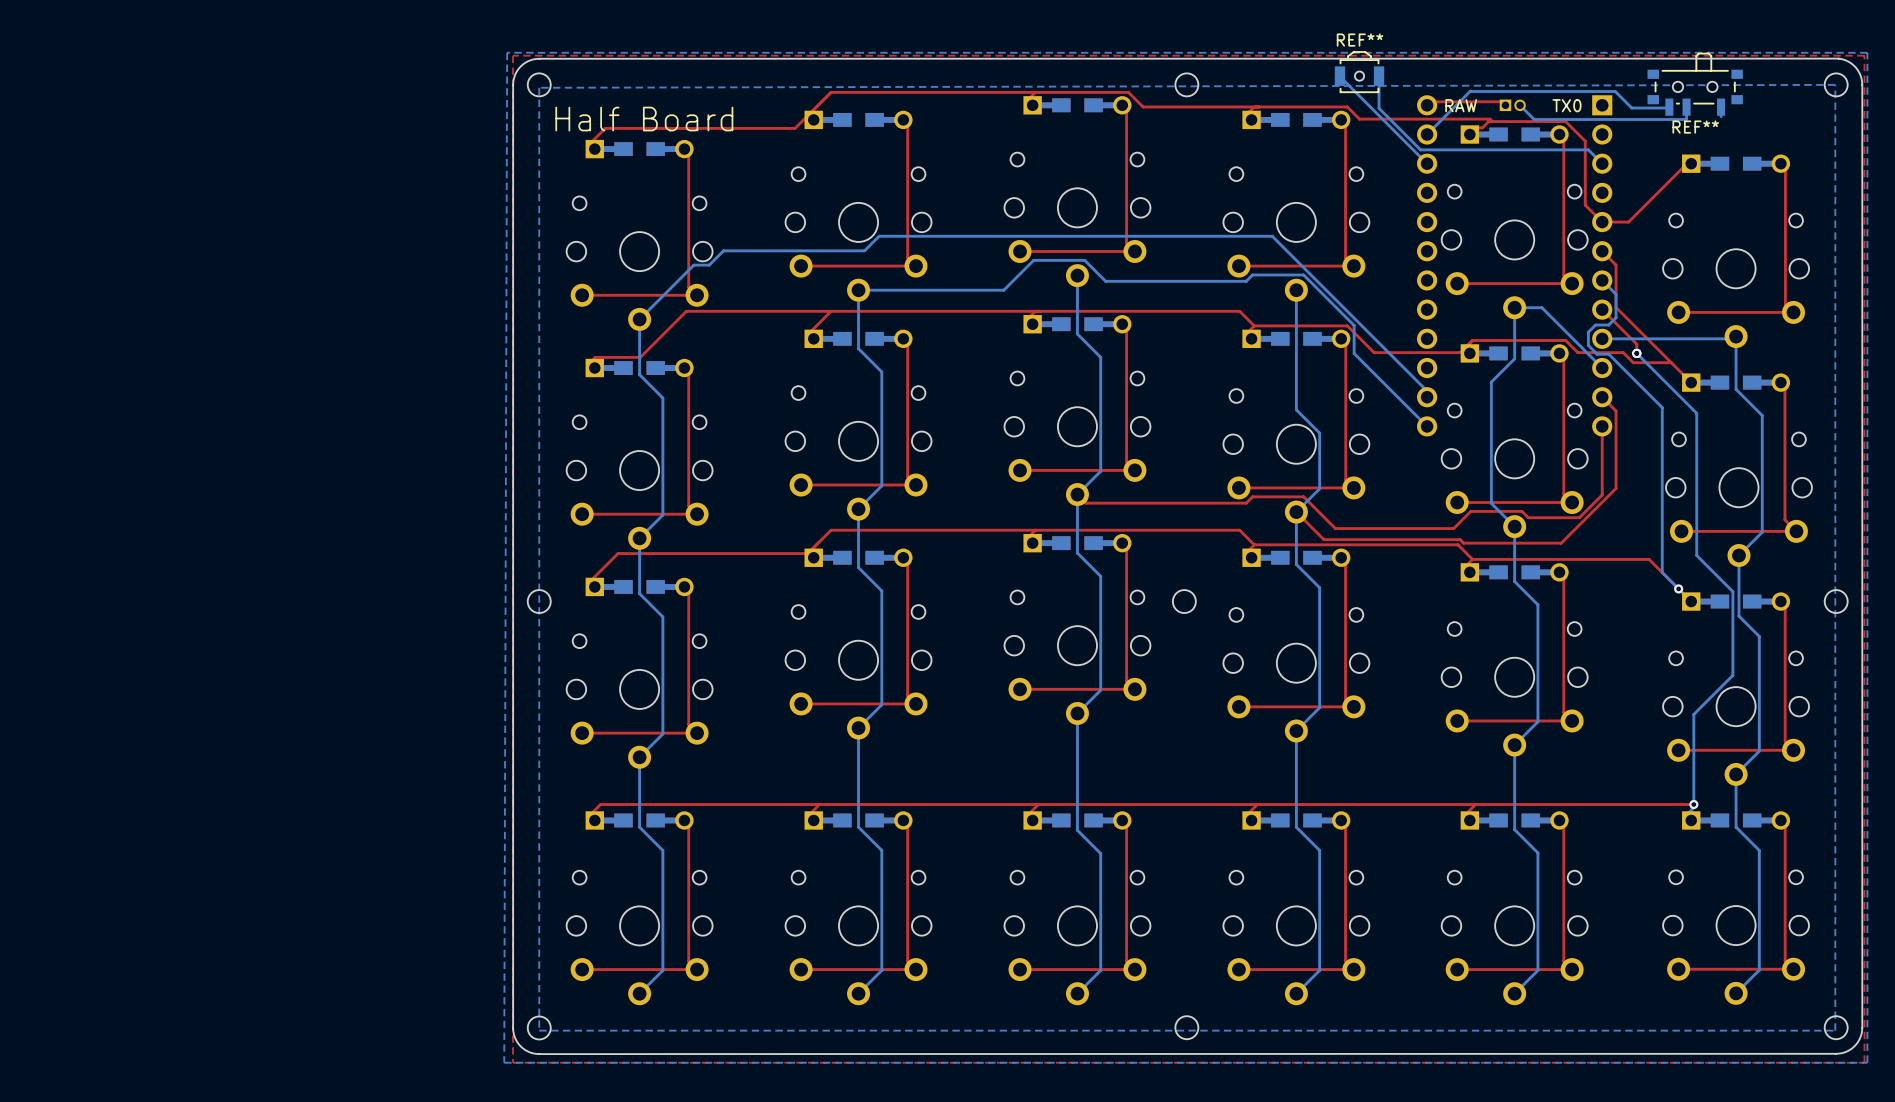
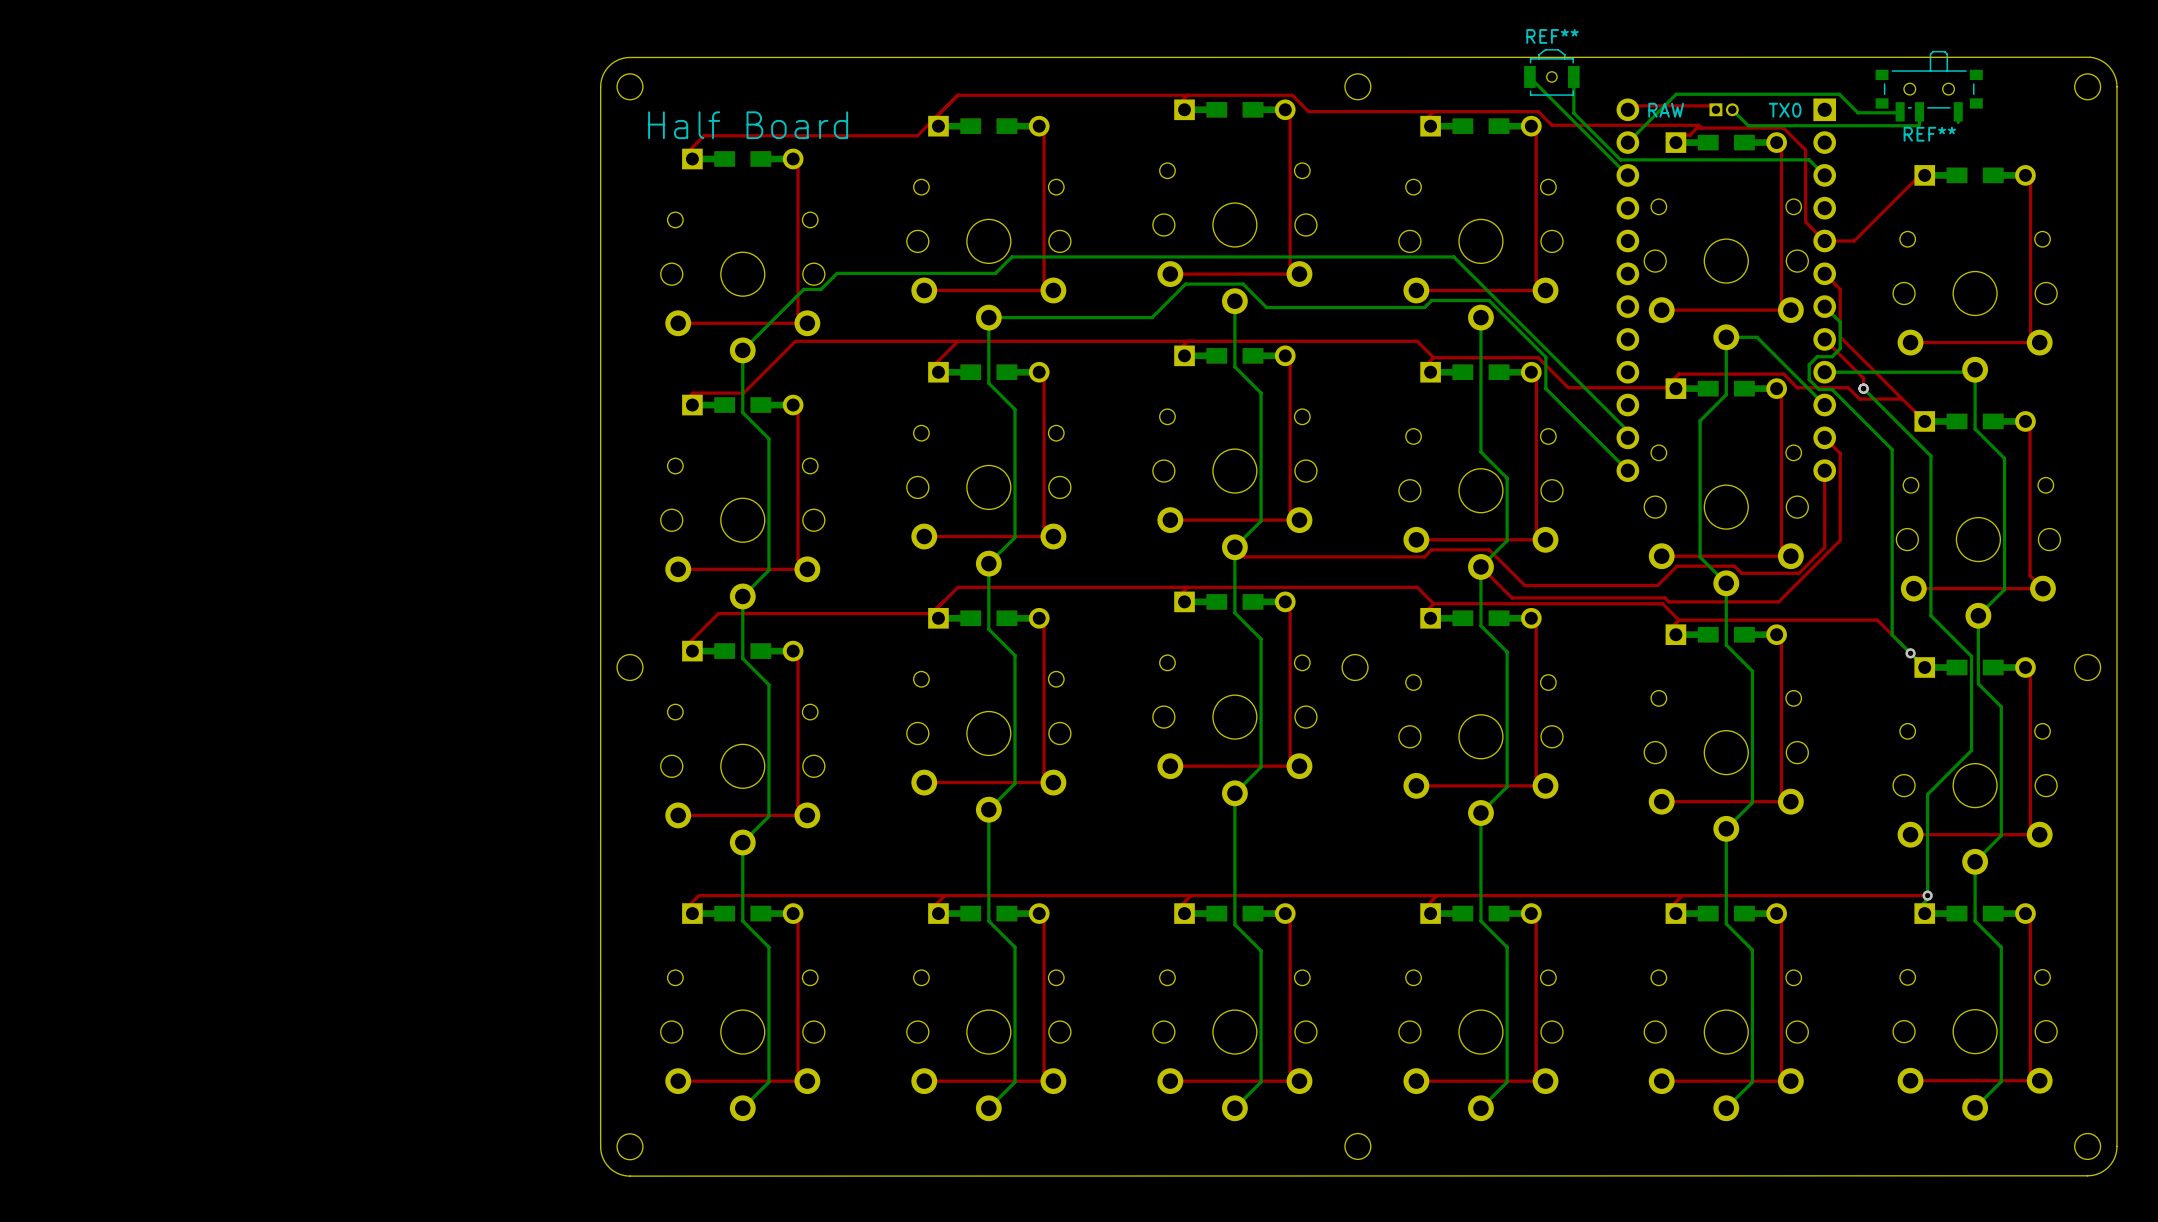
bottom zone outline: (1867, 52) (1867, 1062) (504, 1062) (507, 52) (1867, 52) -> none
top zone outline: (1864, 55) (1864, 1062) (512, 1062) (512, 55) (1864, 55) -> none
bottom zone outline: (1835, 84) (1835, 1030) (539, 1030) (539, 87) (1835, 84) -> none

